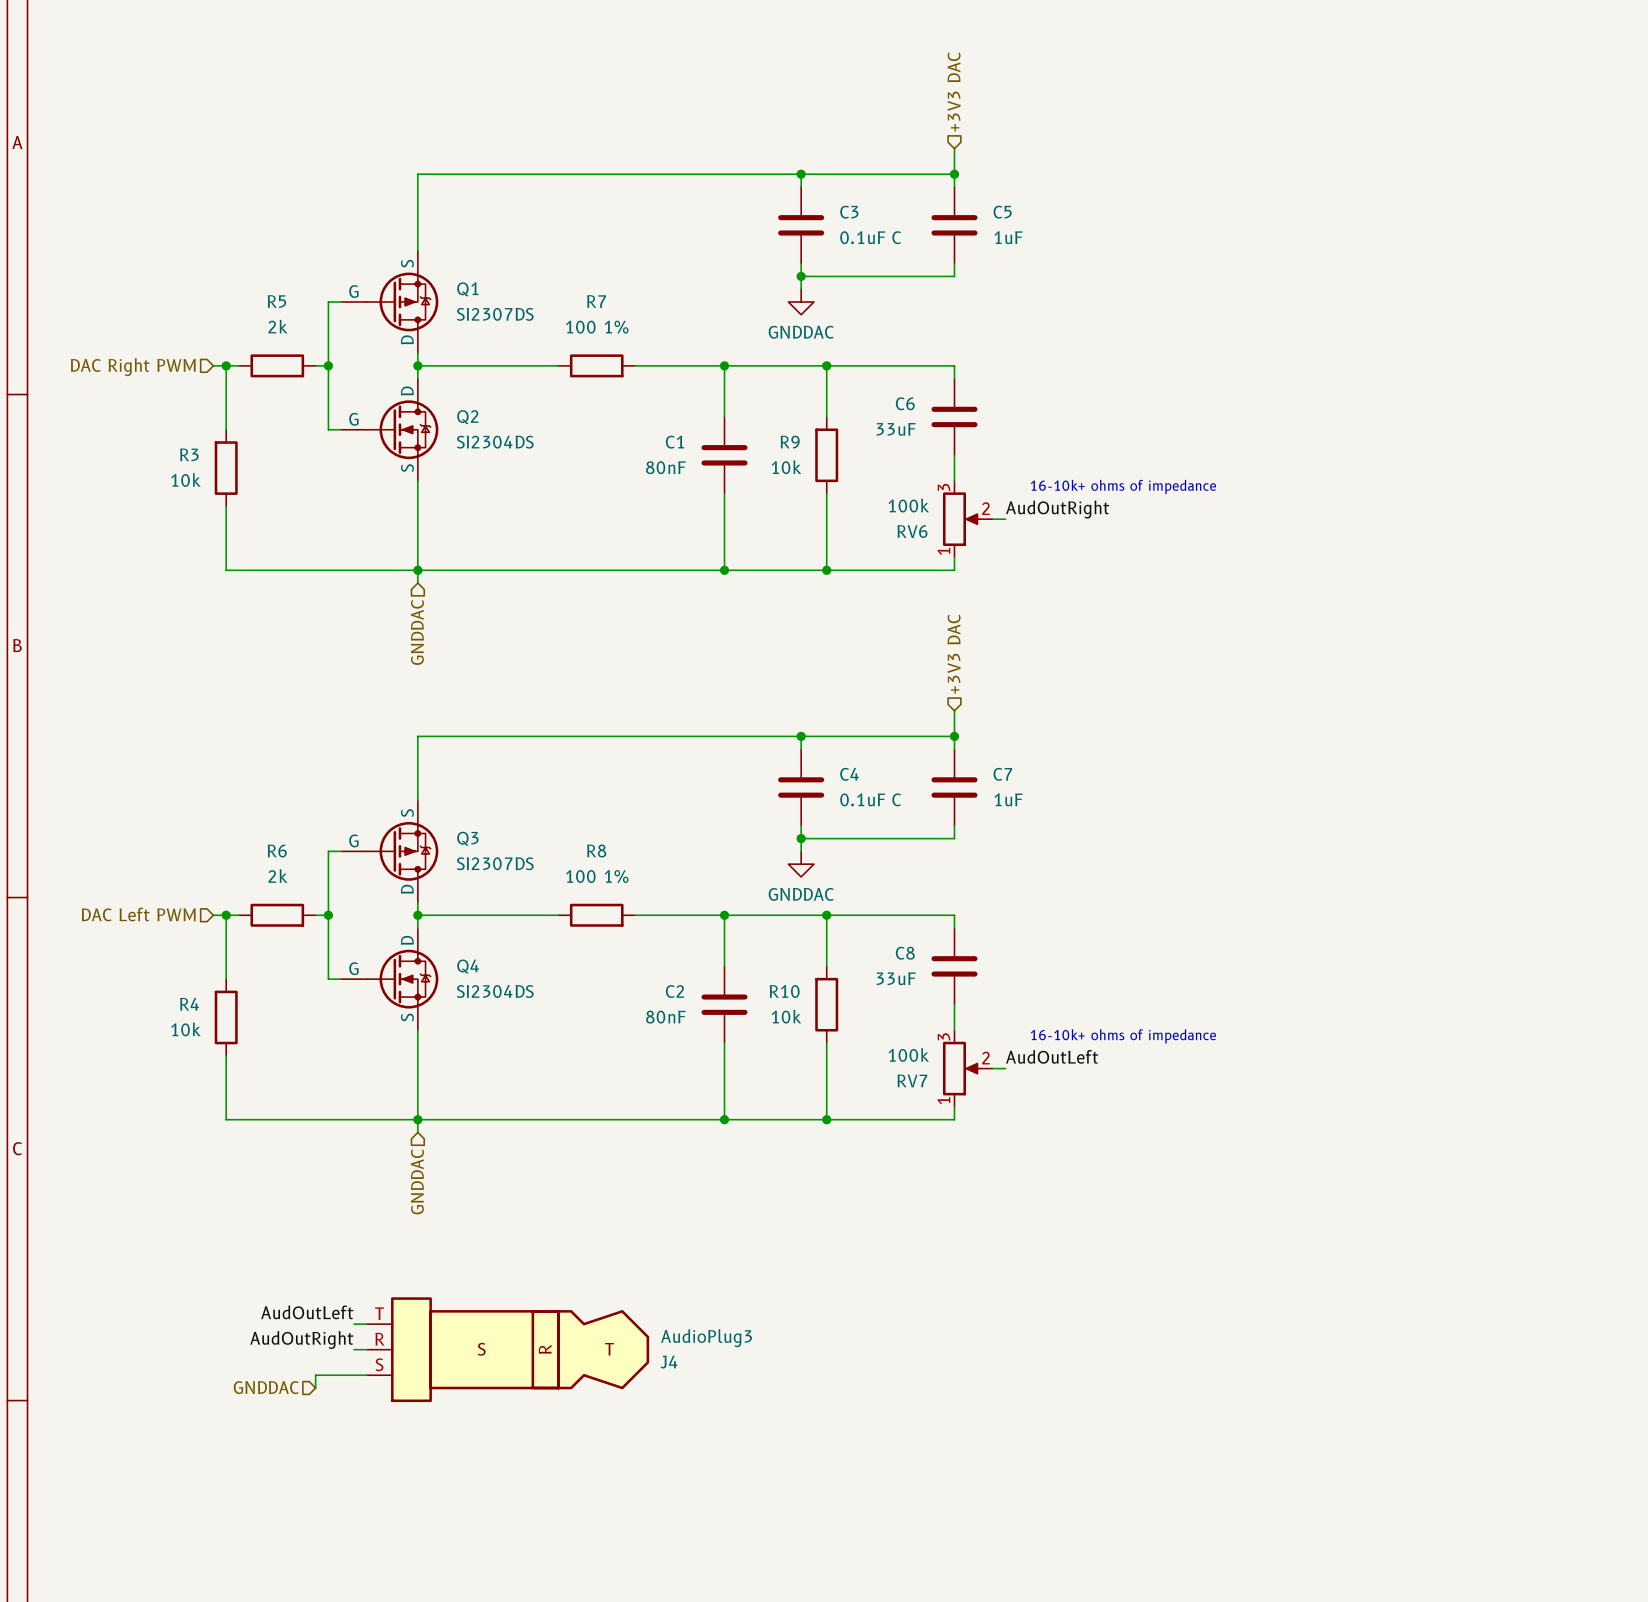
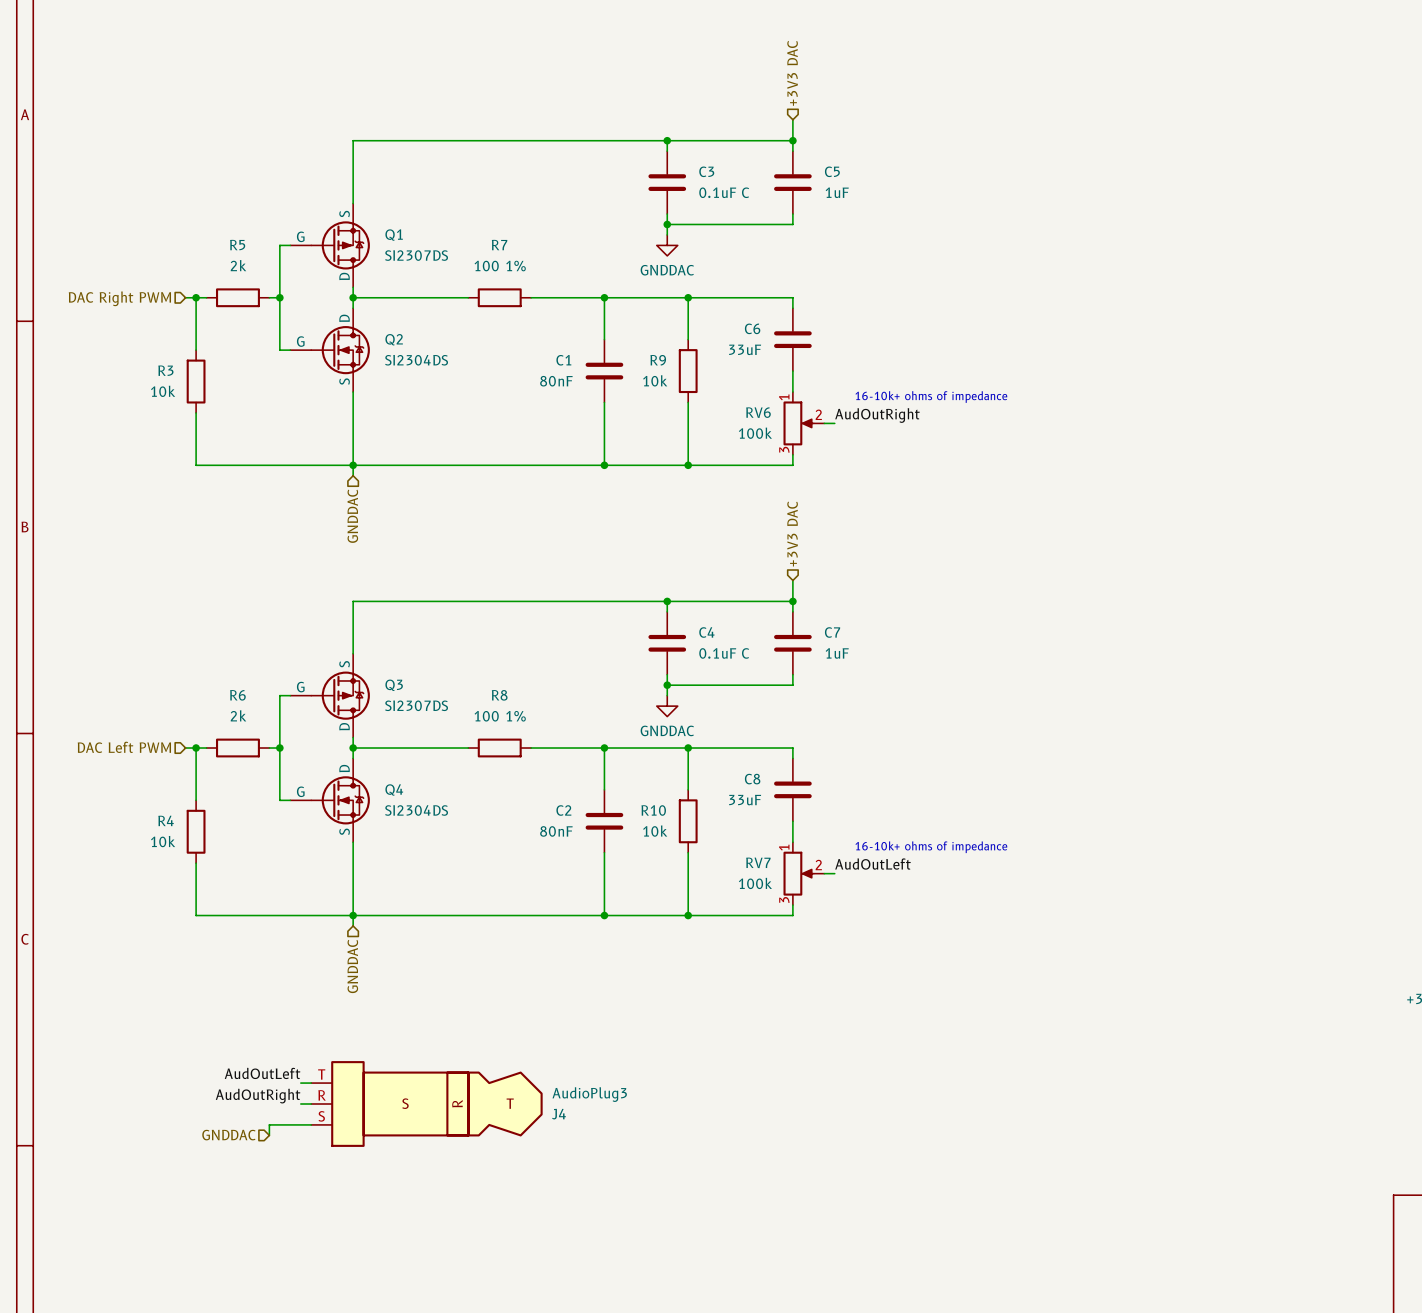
RV6 flip: as is (961, 519) -> up-down (798, 423)
RV7 flip: as is (961, 1068) -> up-down (798, 873)

